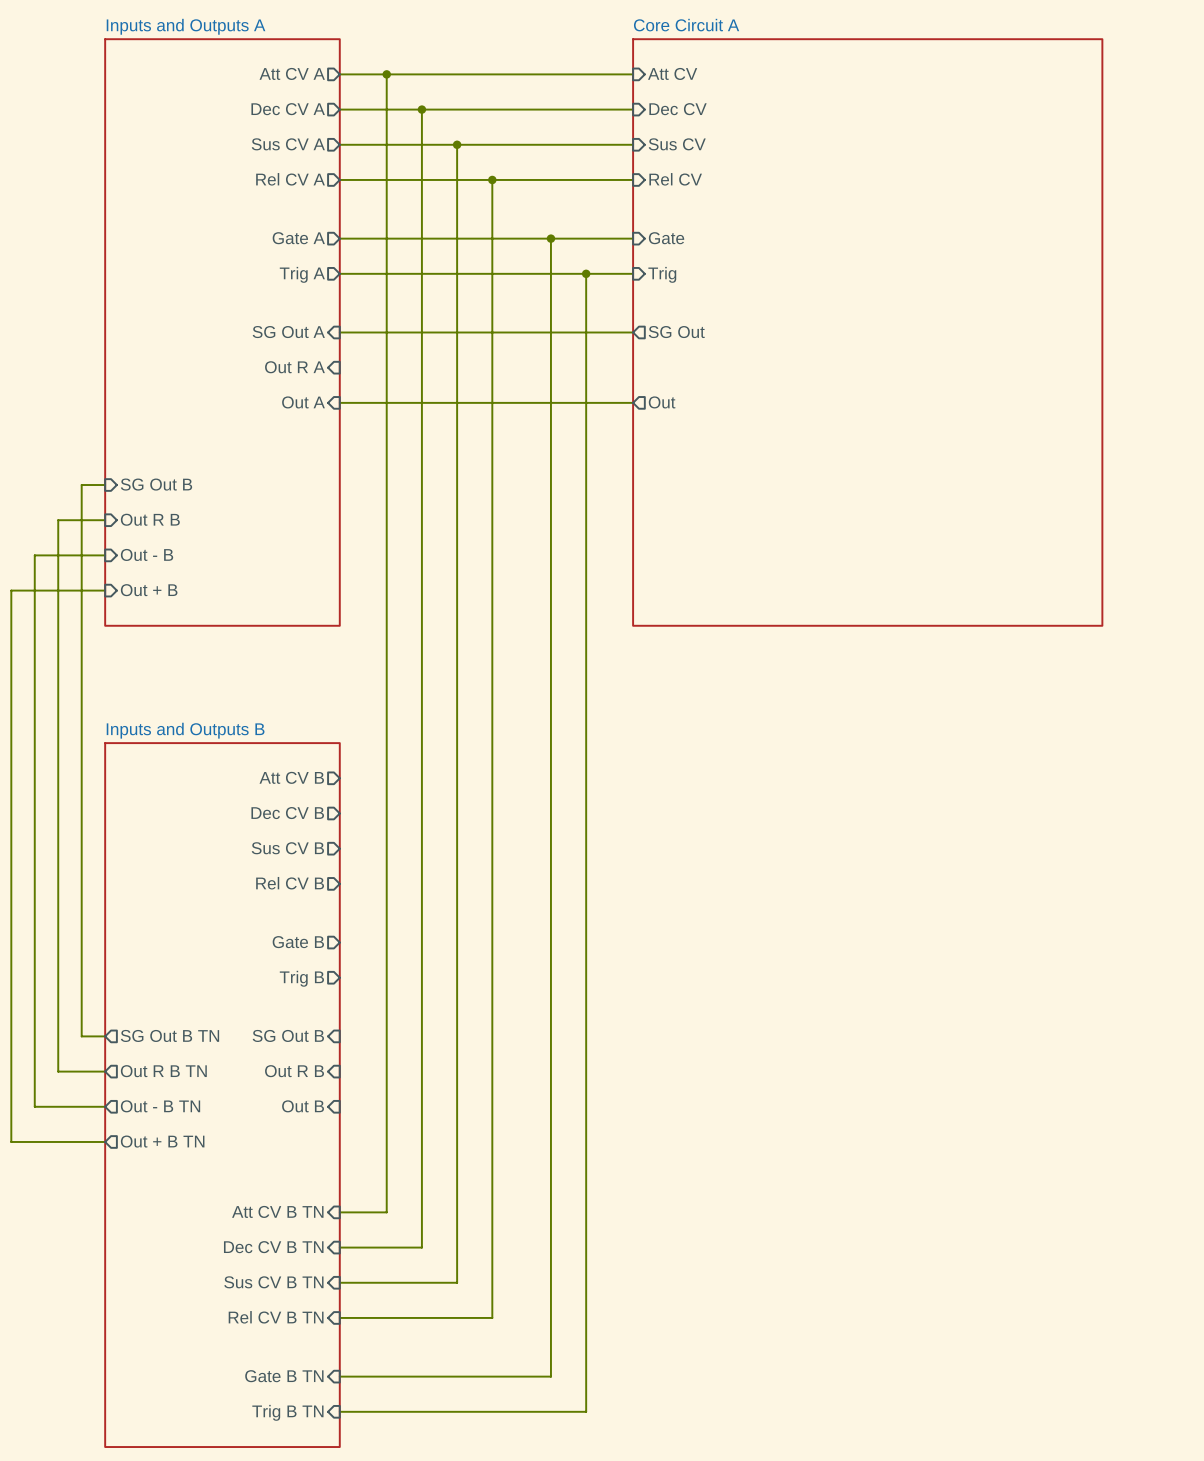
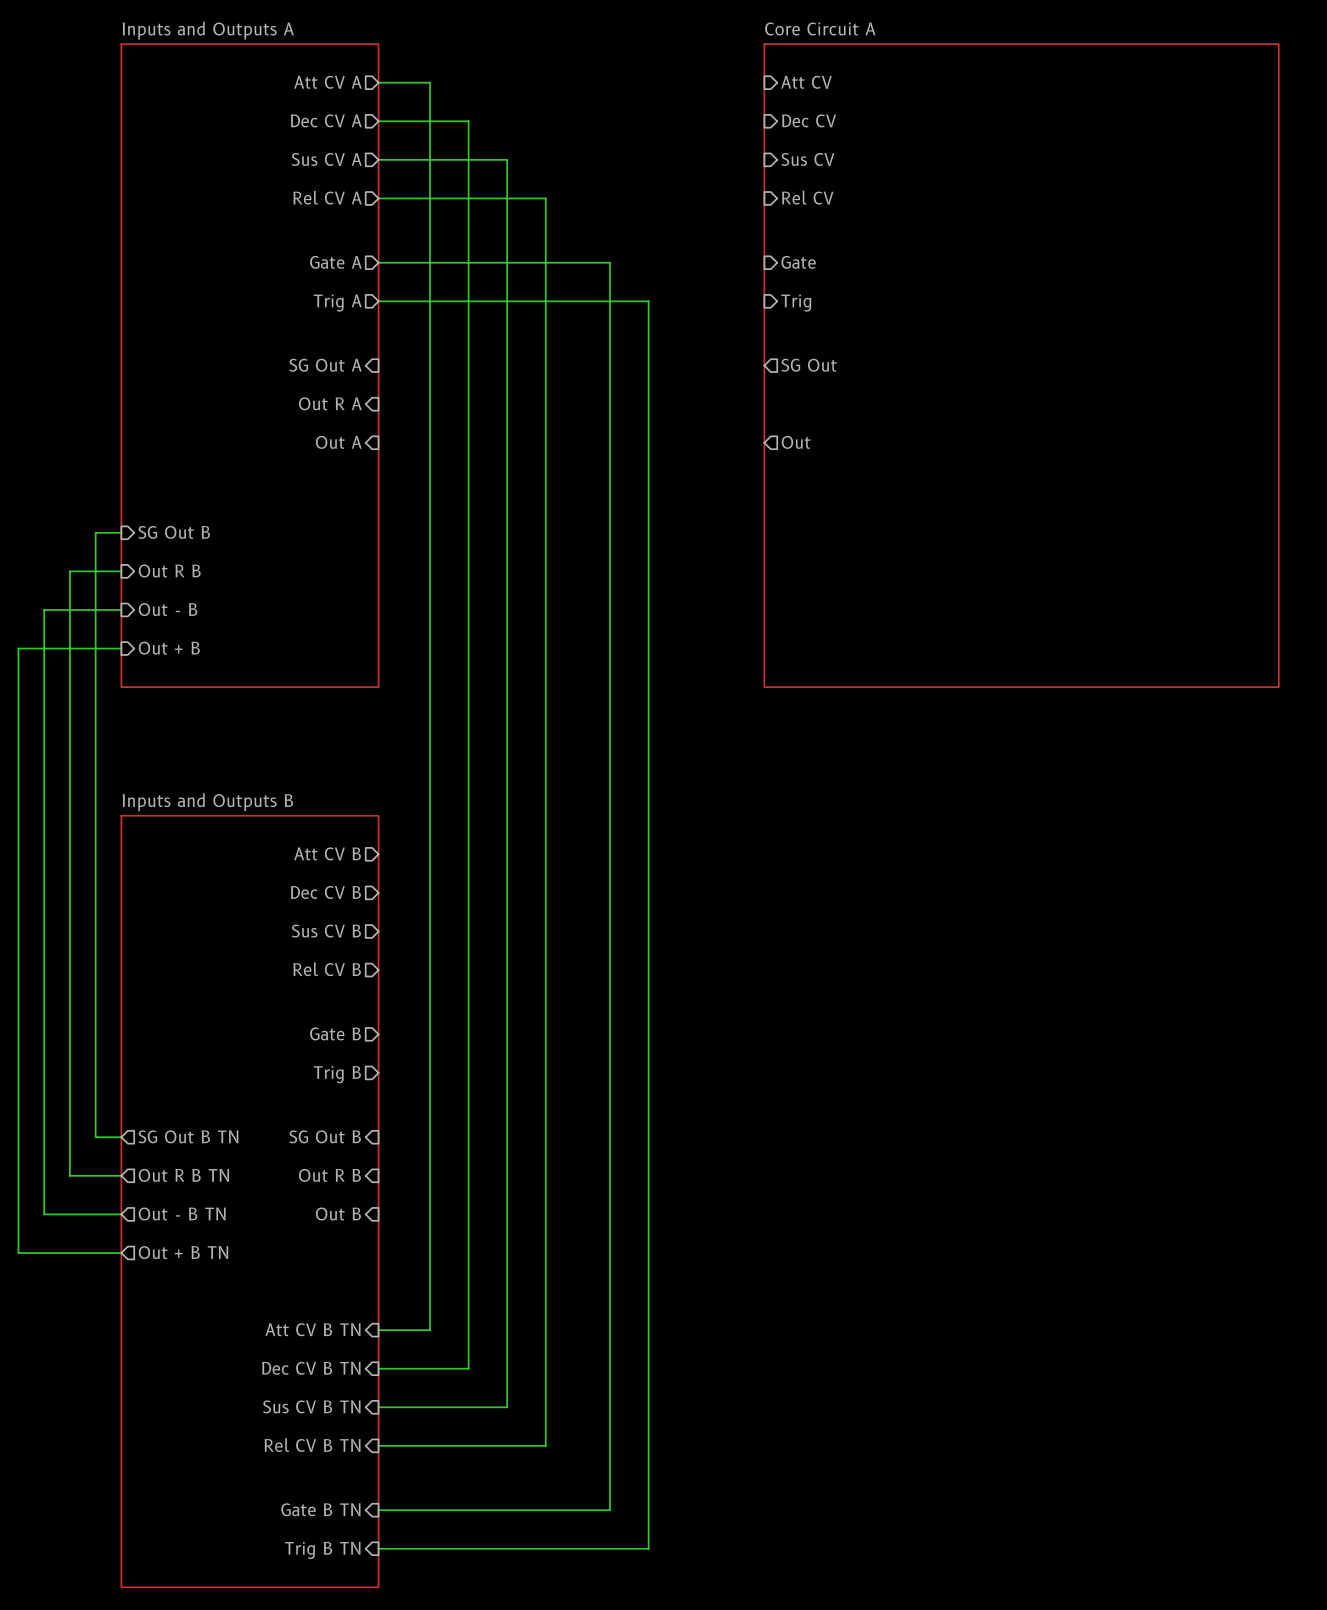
sheet pin position: Att CV (672, 73) -> Att CV (806, 82)
wire: (386, 74) (633, 74) -> none
junction: (386, 74) -> none
wire: (421, 109) (633, 109) -> none
junction: (421, 109) -> none
sheet pin position: Dec CV (678, 109) -> Dec CV (809, 120)
wire: (457, 144) (633, 144) -> none
junction: (457, 144) -> none
sheet pin position: Sus CV (677, 144) -> Sus CV (807, 159)
wire: (492, 179) (633, 179) -> none
junction: (492, 179) -> none
sheet pin position: Rel CV (675, 179) -> Rel CV (807, 197)
wire: (550, 238) (633, 238) -> none
junction: (550, 238) -> none
sheet pin position: Gate (666, 238) -> Gate (798, 262)
wire: (586, 273) (633, 273) -> none
junction: (586, 273) -> none
sheet pin position: Trig (662, 274) -> Trig (796, 303)
wire: (339, 332) (633, 332) -> none
sheet pin position: SG Out (676, 332) -> SG Out (809, 365)
sheet Core Circuit A position: (867, 332) -> (1021, 365)
wire: (339, 402) (633, 402) -> none
sheet pin position: Out (662, 402) -> Out (796, 442)

